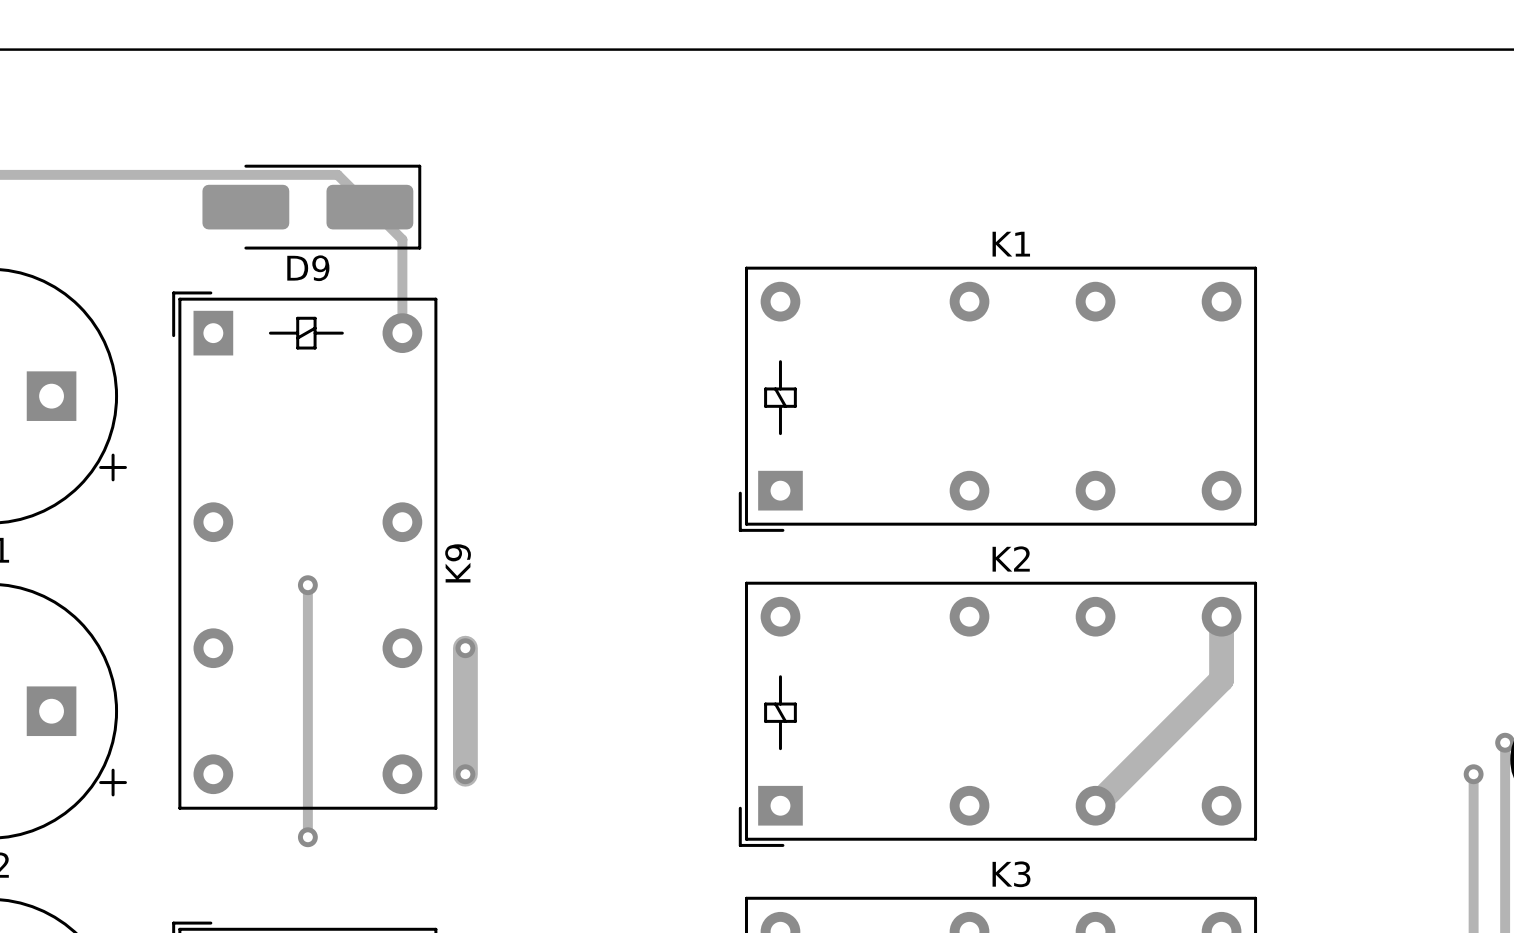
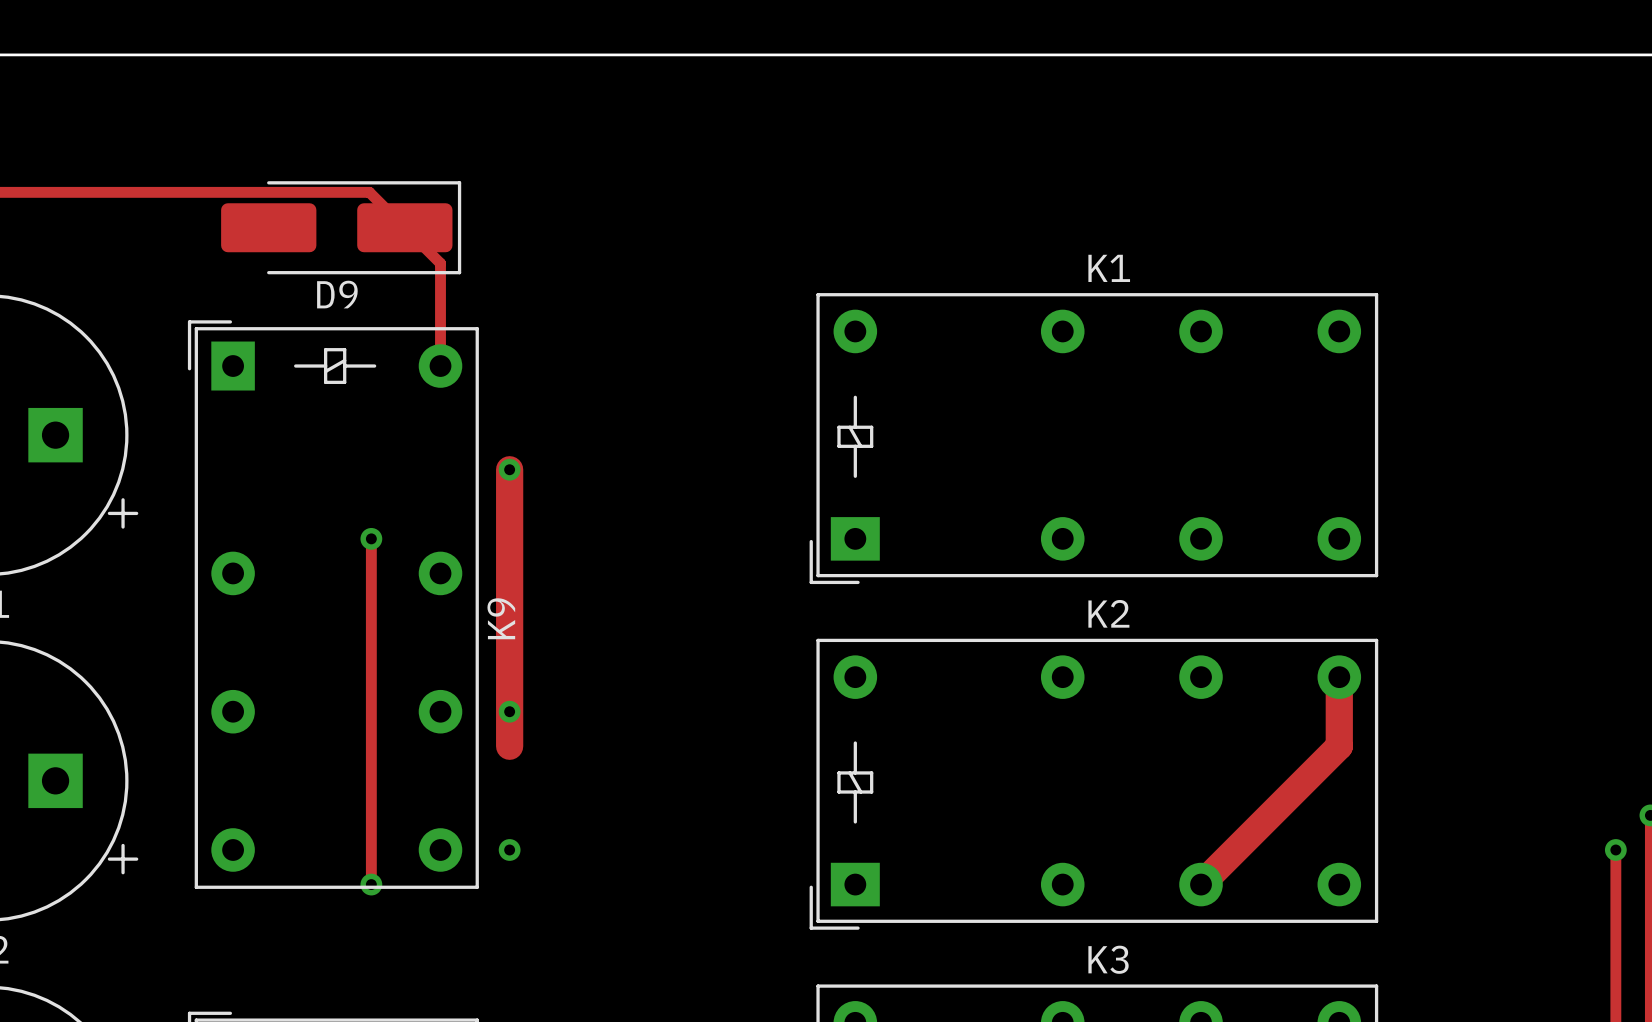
track: none -> (509, 469) (509, 711)
via: none -> (509, 469)
track: none -> (371, 538) (371, 884)
track: (307, 585) (307, 837) -> none
via position: (307, 585) -> (371, 538)
track: (465, 679) (465, 774) -> none
via position: (307, 837) -> (371, 884)

